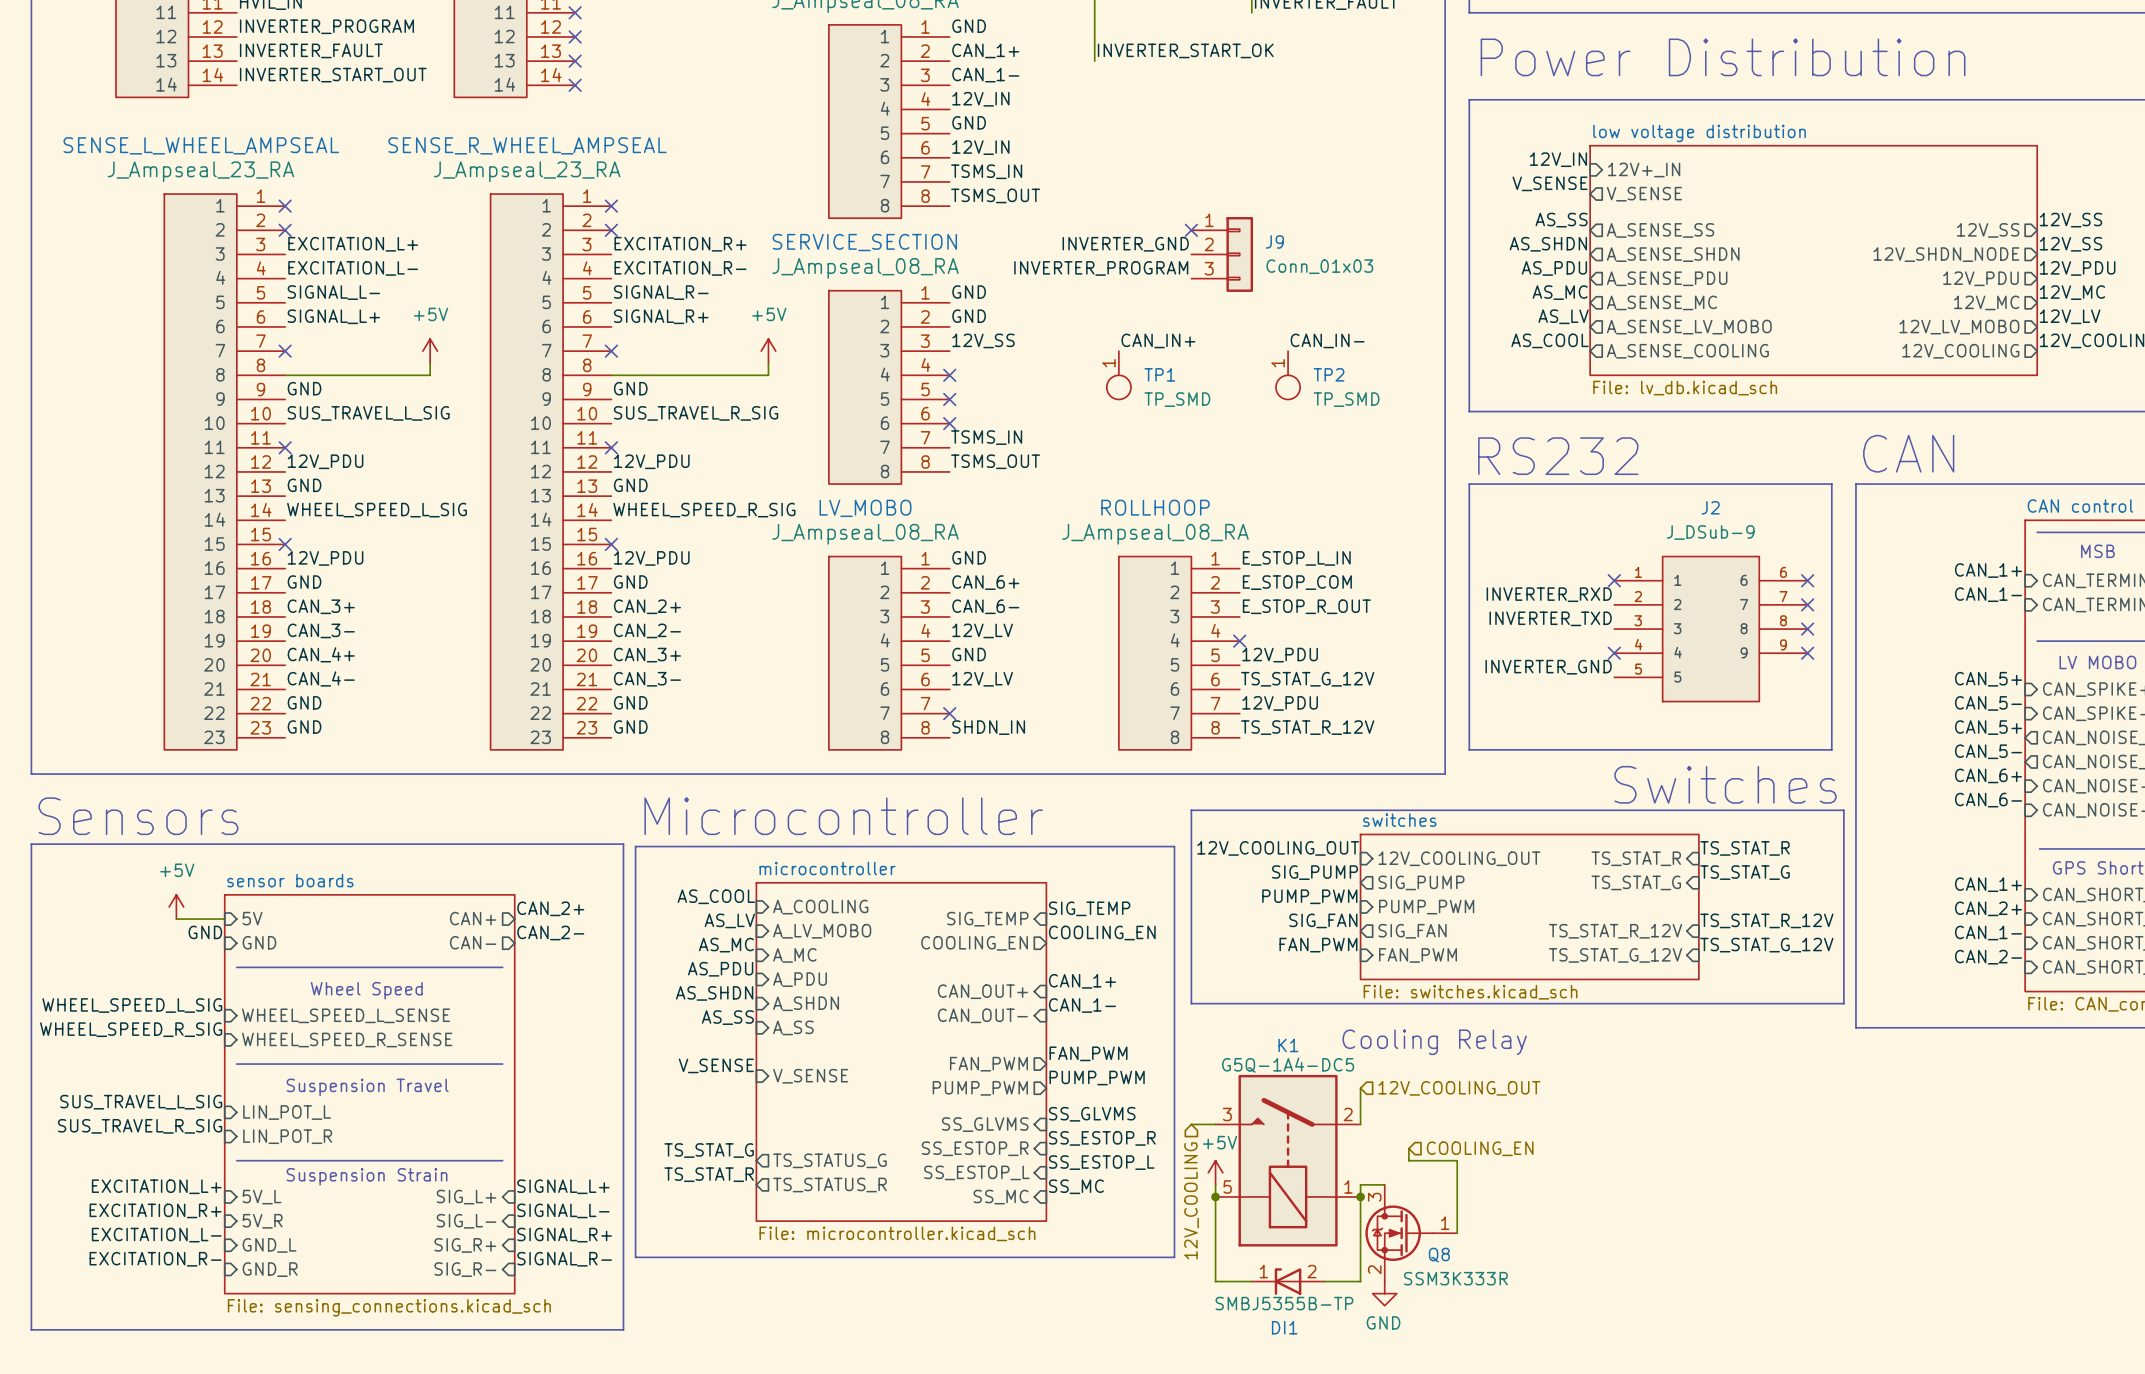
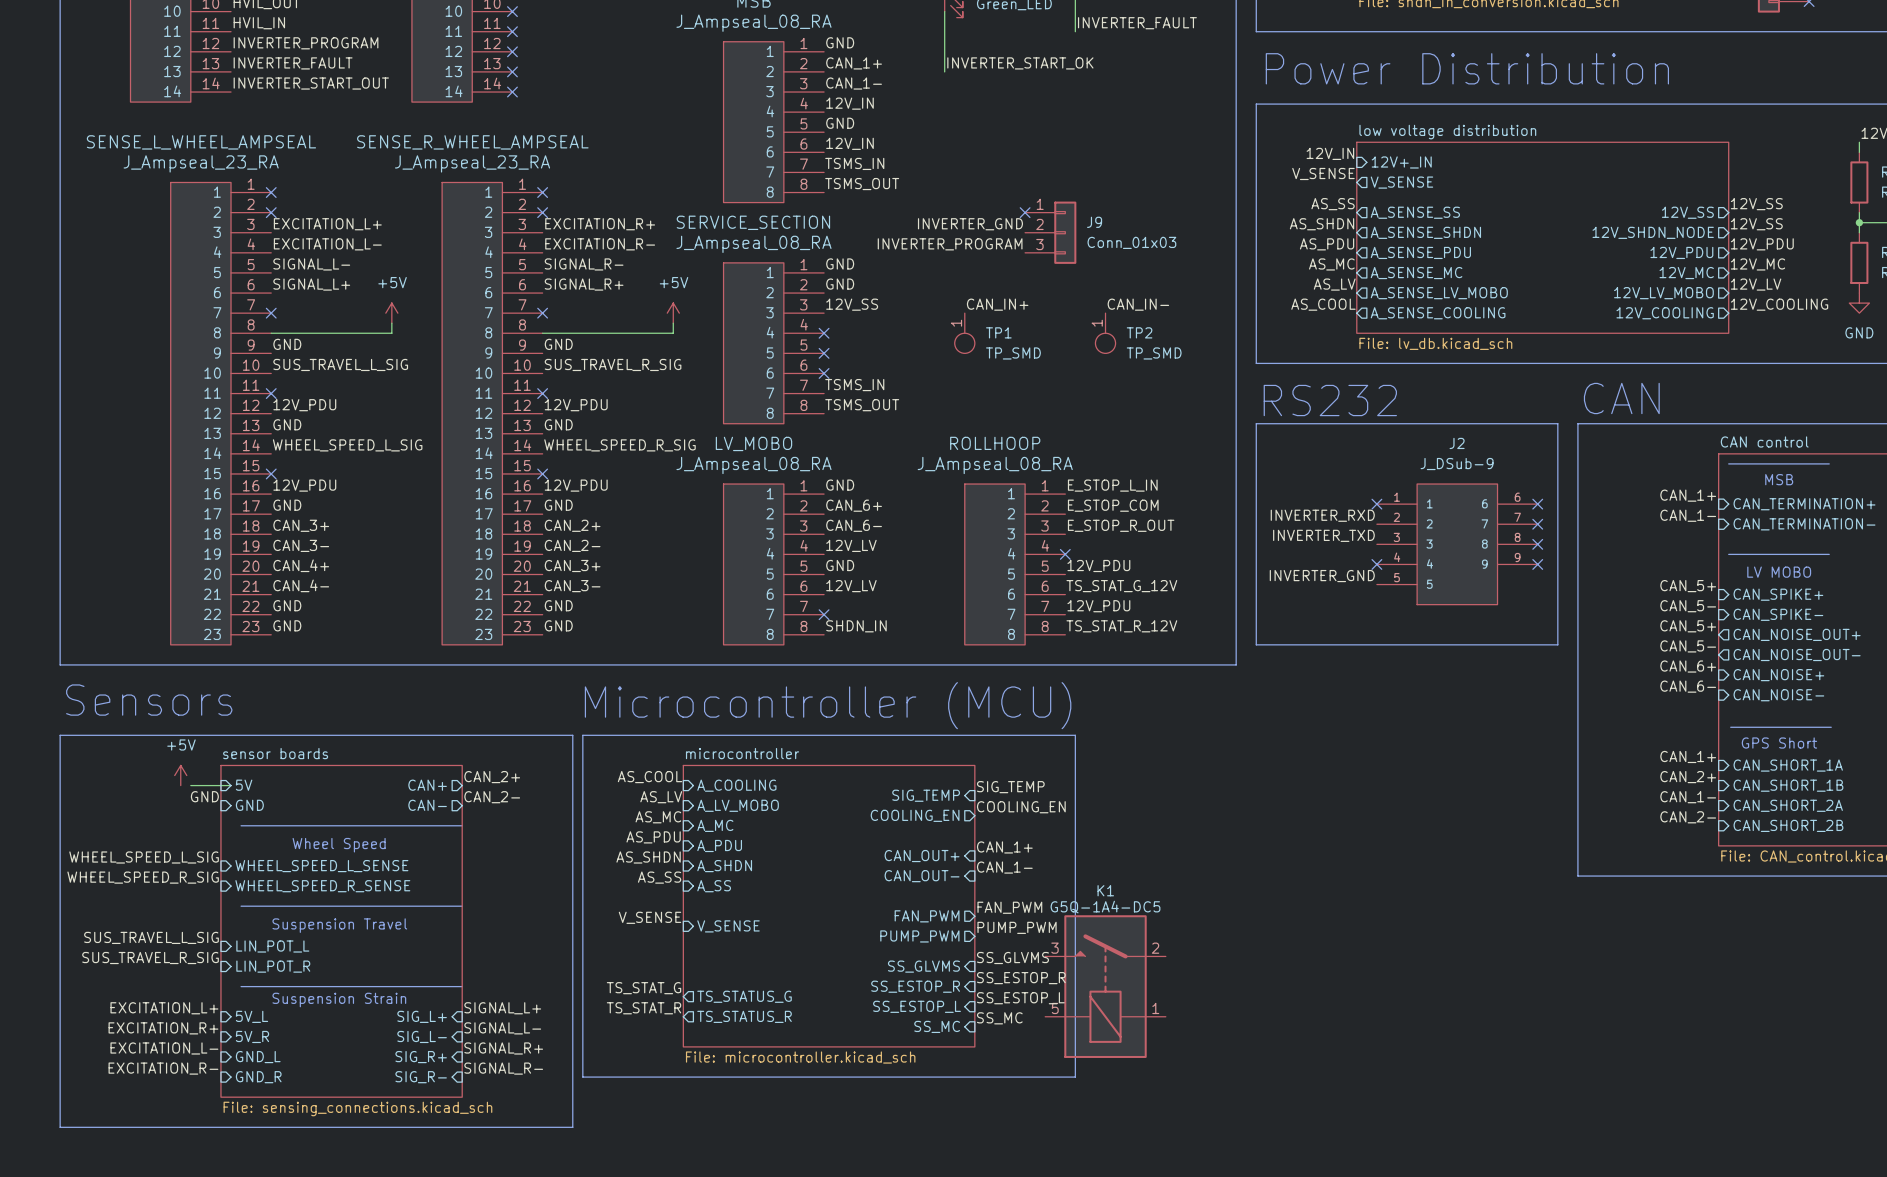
text: Switches (1725, 784) -> none
line: (1191, 810) (1843, 810) (1843, 1003) (1191, 1003) (1191, 810) -> none
text: Microcontroller (843, 816) -> none
text: none -> Microcontroller (MCU) (828, 705)
line: (635, 846) (1174, 846) (1174, 1257) (635, 1257) (635, 846) -> (582, 735) (582, 1077) (1075, 1077) (1075, 735) (582, 735)
label: 12V_COOLING_OUT (1278, 848) -> none
label: TS_STAT_R (1745, 848) -> none
line: (31, 858) (31, 844) (623, 844) (623, 1329) -> (60, 735) (572, 735) (572, 1127) (552, 1127)
sheet pin: 12V_COOLING_OUT (1459, 858) -> none
sheet pin: TS_STAT_R (1636, 858) -> none
label: SIG_PUMP (1315, 872) -> none
label: TS_STAT_G (1745, 872) -> none
sheet pin: SIG_PUMP (1421, 882) -> none
sheet pin: TS_STAT_G (1636, 882) -> none
label position: AS_COOL (716, 896) -> AS_COOL (650, 777)
label: PUMP_PWM (1309, 896) -> none
sheet switches: File: switches.kicad_sch (1529, 906) -> none
sheet pin position: A_COOLING (820, 907) -> A_COOLING (736, 785)
sheet pin: PUMP_PWM (1426, 907) -> none
label position: SIG_TEMP (1089, 908) -> SIG_TEMP (1010, 787)
wire: (176, 919) (188, 919) -> (220, 785) (231, 785)
sheet pin position: SIG_TEMP (987, 919) -> SIG_TEMP (926, 795)
label position: AS_LV (729, 920) -> AS_LV (661, 797)
label: SIG_FAN (1323, 920) -> none
label: TS_STAT_R_12V (1766, 920) -> none
sheet pin position: A_LV_MOBO (822, 931) -> A_LV_MOBO (738, 805)
sheet pin: SIG_FAN (1412, 931) -> none
sheet pin: TS_STAT_R_12V (1615, 931) -> none
label position: COOLING_EN (1102, 933) -> COOLING_EN (1021, 807)
sheet pin position: COOLING_EN (974, 943) -> COOLING_EN (915, 815)
label position: AS_MC (726, 945) -> AS_MC (658, 817)
label: FAN_PWM (1318, 945) -> none
label: TS_STAT_G_12V (1766, 945) -> none
sheet pin position: A_MC (794, 955) -> A_MC (715, 825)
sheet pin: FAN_PWM (1418, 955) -> none
sheet pin: TS_STAT_G_12V (1615, 955) -> none
line: (236, 967) (248, 967) -> none
line: none -> (452, 825) (462, 825)
label position: AS_PDU (720, 969) -> AS_PDU (653, 837)
sheet pin position: A_PDU (800, 979) -> A_PDU (719, 845)
label position: CAN_1+ (1082, 981) -> CAN_1+ (1004, 847)
sheet pin position: CAN_OUT+ (982, 991) -> CAN_OUT+ (922, 856)
label position: AS_SHDN (714, 993) -> AS_SHDN (648, 857)
sheet pin position: A_SHDN (806, 1003) -> A_SHDN (724, 866)
label position: CAN_1- (1082, 1005) -> CAN_1- (1004, 867)
sheet pin position: CAN_OUT- (982, 1015) -> CAN_OUT- (922, 876)
label position: AS_SS (727, 1017) -> AS_SS (659, 877)
sheet pin position: A_SS (793, 1027) -> A_SS (714, 886)
text: Cooling Relay (1434, 1042) -> none
sheet microcontroller: File: microcontroller.kicad_sch (901, 1051) -> none
label position: FAN_PWM (1088, 1053) -> FAN_PWM (1009, 907)
line: (236, 1064) (248, 1064) -> none
line: none -> (452, 906) (462, 906)
sheet microcontroller: none -> File: microcontroller.kicad_sch (829, 906)
sheet pin position: FAN_PWM (988, 1064) -> FAN_PWM (927, 916)
label position: V_SENSE (716, 1065) -> V_SENSE (650, 917)
sheet pin position: V_SENSE (810, 1076) -> V_SENSE (728, 926)
label position: PUMP_PWM (1097, 1078) -> PUMP_PWM (1017, 927)
sheet pin position: PUMP_PWM (980, 1088) -> PUMP_PWM (919, 936)
wire: (1360, 1088) (1360, 1124) -> none
hierarchical label: 12V_COOLING_OUT (1459, 1088) -> none
label position: SS_GLVMS (1092, 1114) -> SS_GLVMS (1012, 958)
sheet pin position: SS_GLVMS (985, 1124) -> SS_GLVMS (923, 966)
wire: (1191, 1124) (1215, 1124) -> none
label position: SS_ESTOP_R (1102, 1138) -> SS_ESTOP_R (1021, 978)
sheet pin position: SS_ESTOP_R (975, 1148) -> SS_ESTOP_R (915, 986)
wire: (1408, 1148) (1408, 1160) (1457, 1160) (1457, 1233) -> none
hierarchical label: COOLING_EN (1480, 1148) -> none
label position: TS_STAT_G (709, 1150) -> TS_STAT_G (644, 988)
line: (236, 1160) (248, 1160) -> none
line: none -> (452, 986) (462, 986)
sheet pin position: TS_STATUS_G (829, 1160) -> TS_STATUS_G (744, 996)
label position: SS_ESTOP_L (1101, 1162) -> SS_ESTOP_L (1020, 998)
sheet pin position: SS_ESTOP_L (976, 1172) -> SS_ESTOP_L (917, 1006)
power symbol: +5V (1215, 1172) -> none
label position: TS_STAT_R (709, 1174) -> TS_STAT_R (644, 1008)
wire: (1215, 1184) (1215, 1281) (1251, 1281) -> none
wire: (1384, 1184) (1360, 1184) (1360, 1281) (1324, 1281) -> none
sheet pin position: TS_STATUS_R (829, 1185) -> TS_STATUS_R (744, 1016)
label position: SS_MC (1076, 1186) -> SS_MC (999, 1018)
junction: (1215, 1196) -> none
junction: (1360, 1196) -> none
sheet pin position: SS_MC (1001, 1197) -> SS_MC (937, 1026)
hierarchical label: 12V_COOLING (1191, 1200) -> none
Q8: SSM3K333R (1411, 1233) -> none
DI1: SMBJ5355B-TP (1288, 1281) -> none
power symbol: GND (1384, 1293) -> none

